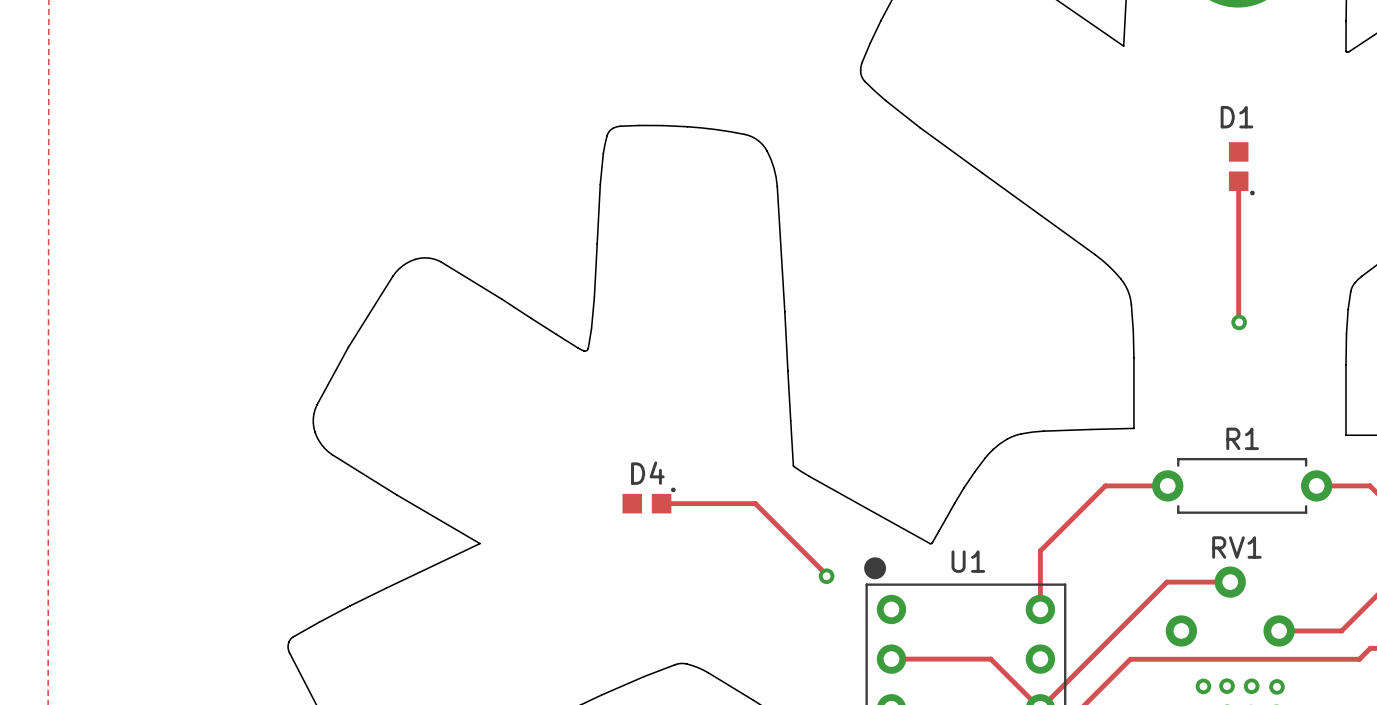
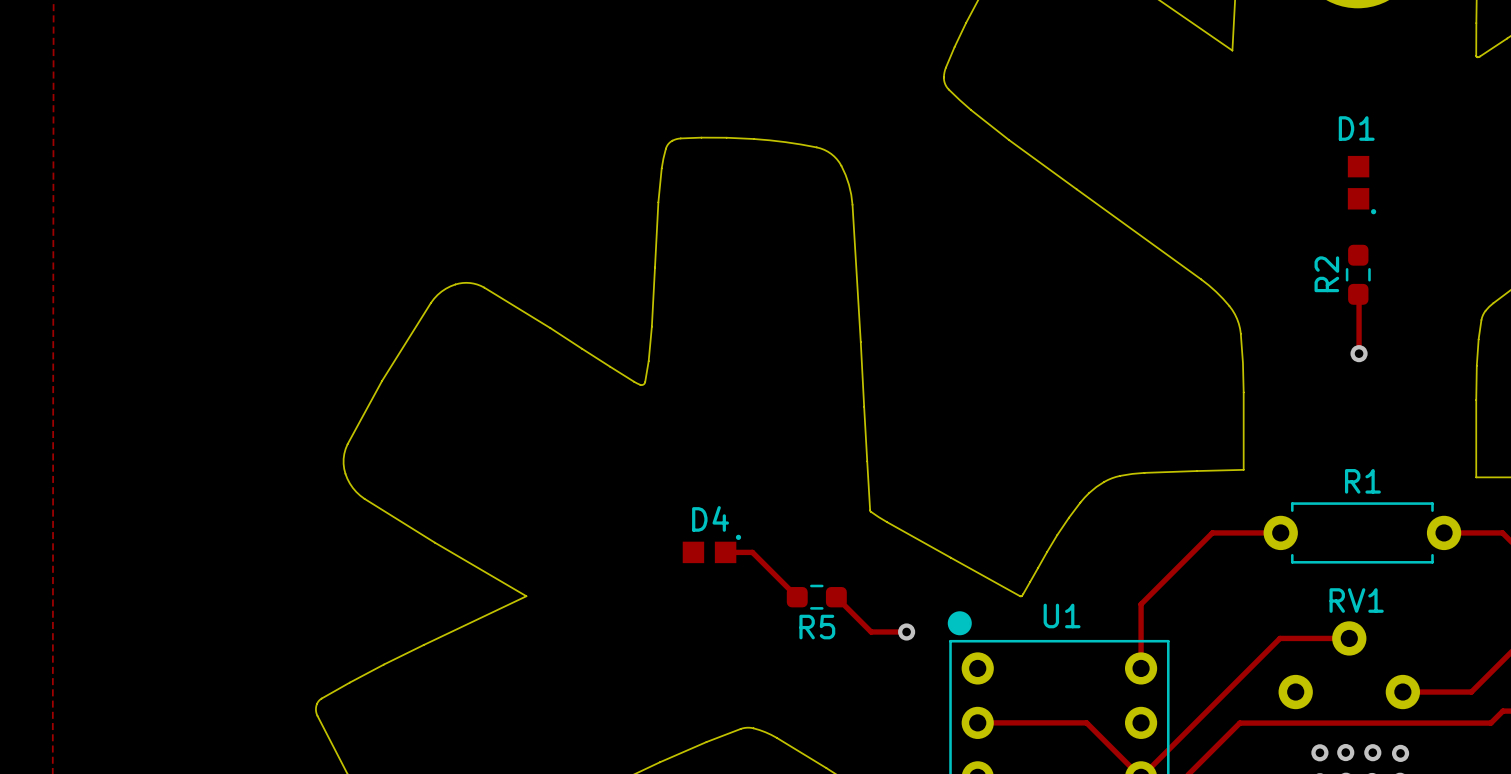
track: (1238, 181) (1238, 321) -> (1358, 294) (1359, 353)
R2: none -> (1358, 274)
track: (686, 503) (755, 503) (826, 574) -> (752, 552) (797, 597)
R5: none -> (816, 597)
track: none -> (836, 597) (871, 631) (906, 631)

